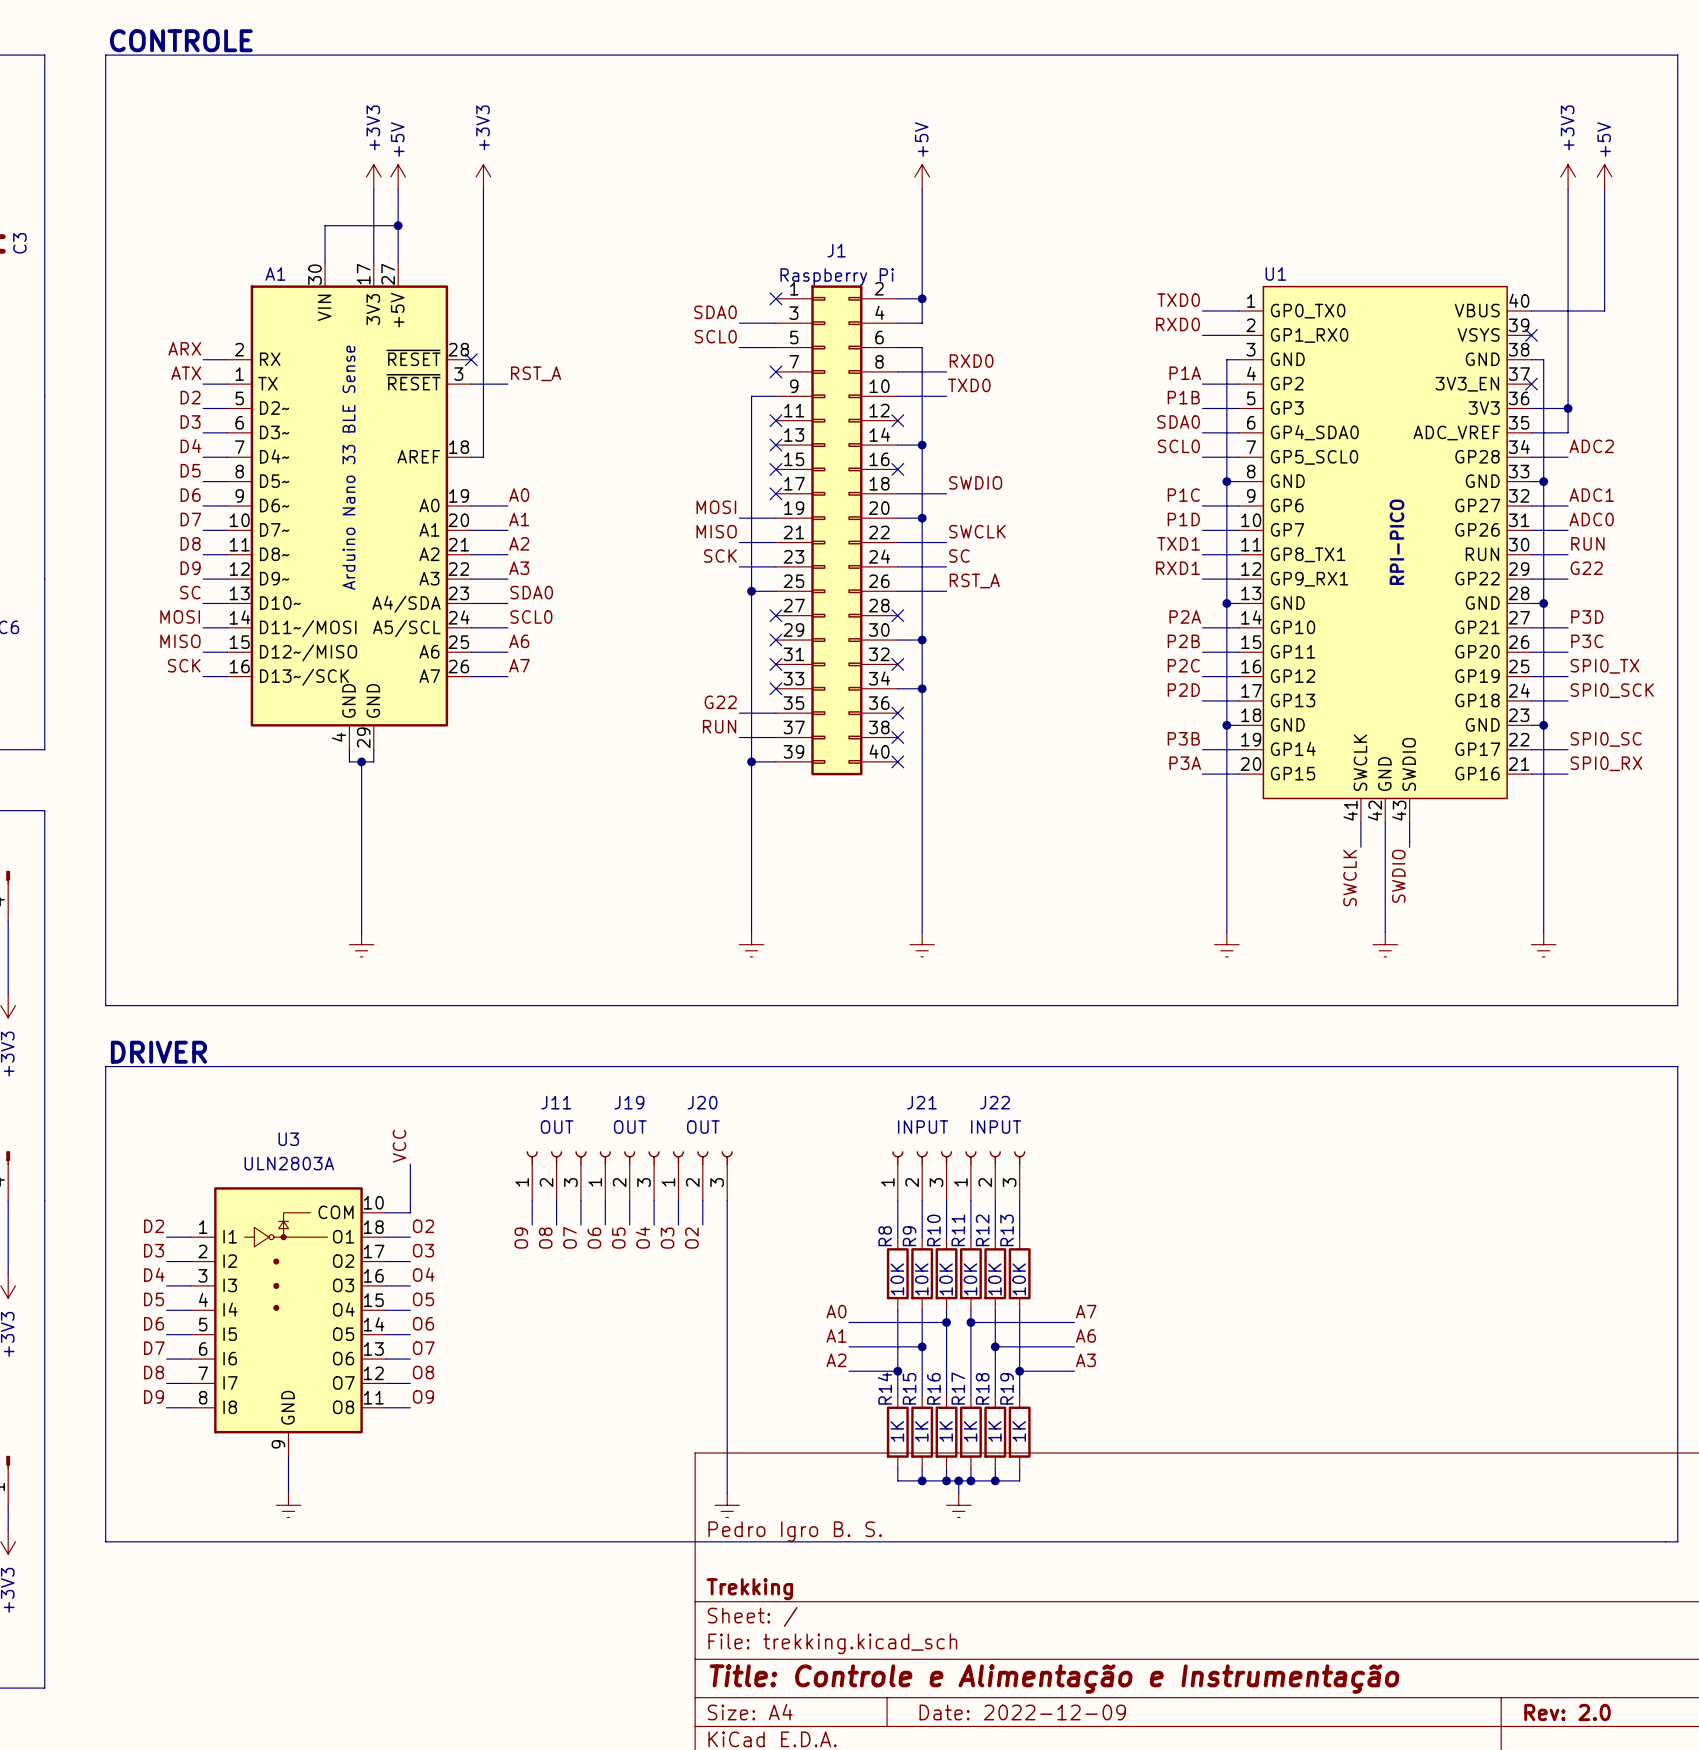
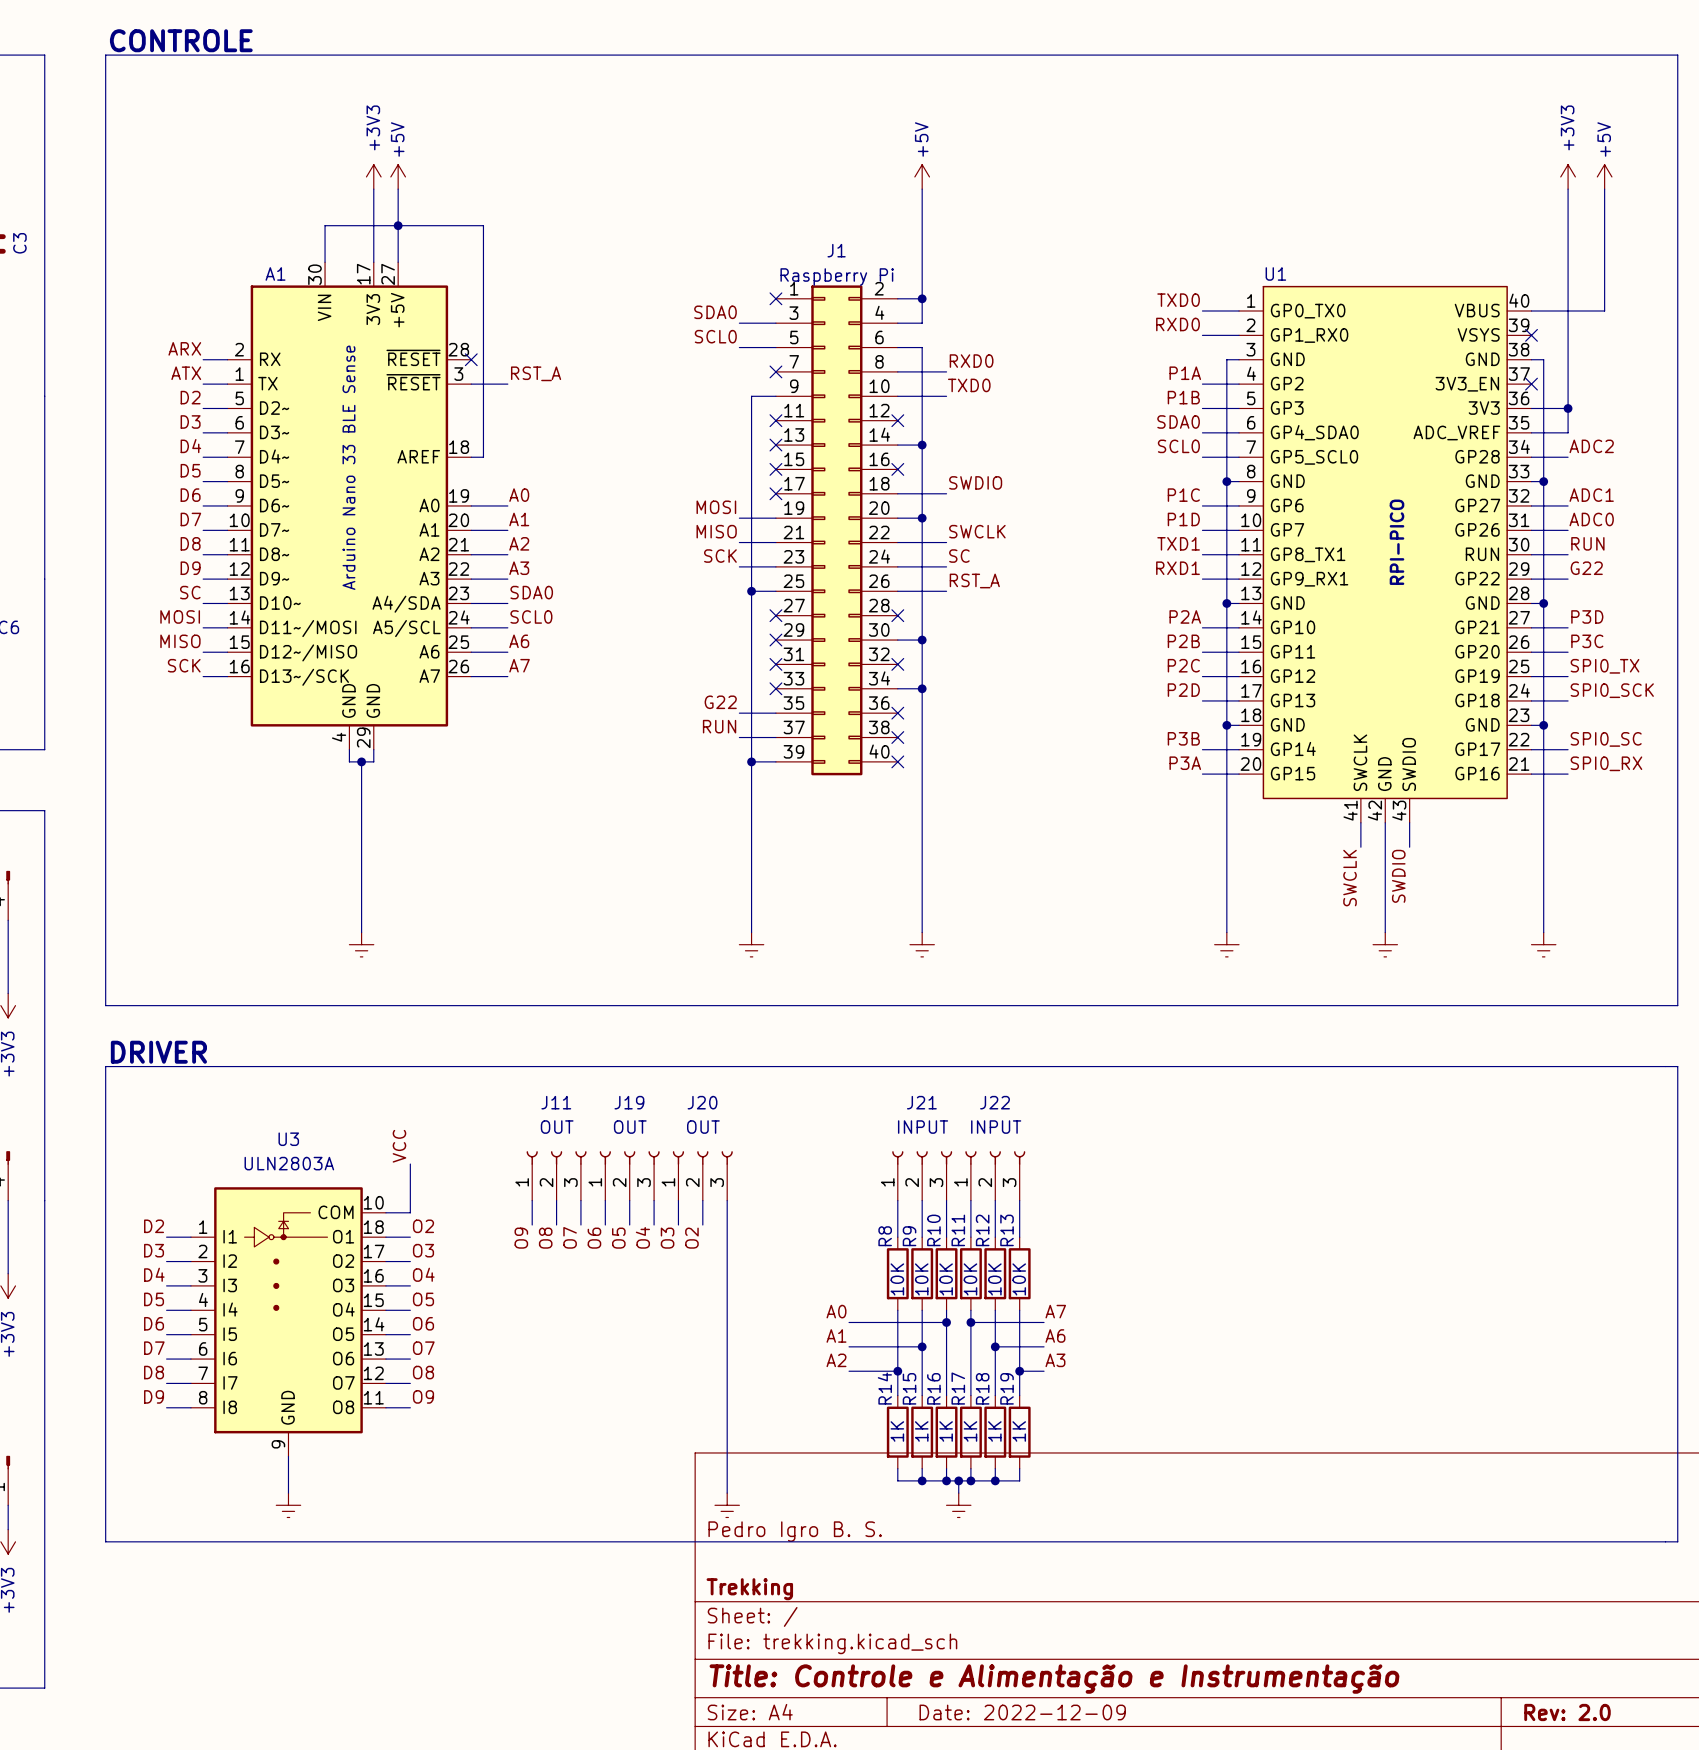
power symbol: +3V3 (483, 176) -> none
wire: (483, 189) (483, 225) -> (398, 225) (483, 225)
label position: A7 (1086, 1311) -> A7 (1055, 1311)
wire: (1044, 1322) (1074, 1322) -> none
label position: A6 (1085, 1335) -> A6 (1055, 1335)
wire: (1044, 1346) (1074, 1346) -> none
label position: A3 (1085, 1360) -> A3 (1055, 1360)
wire: (1044, 1371) (1074, 1371) -> none

